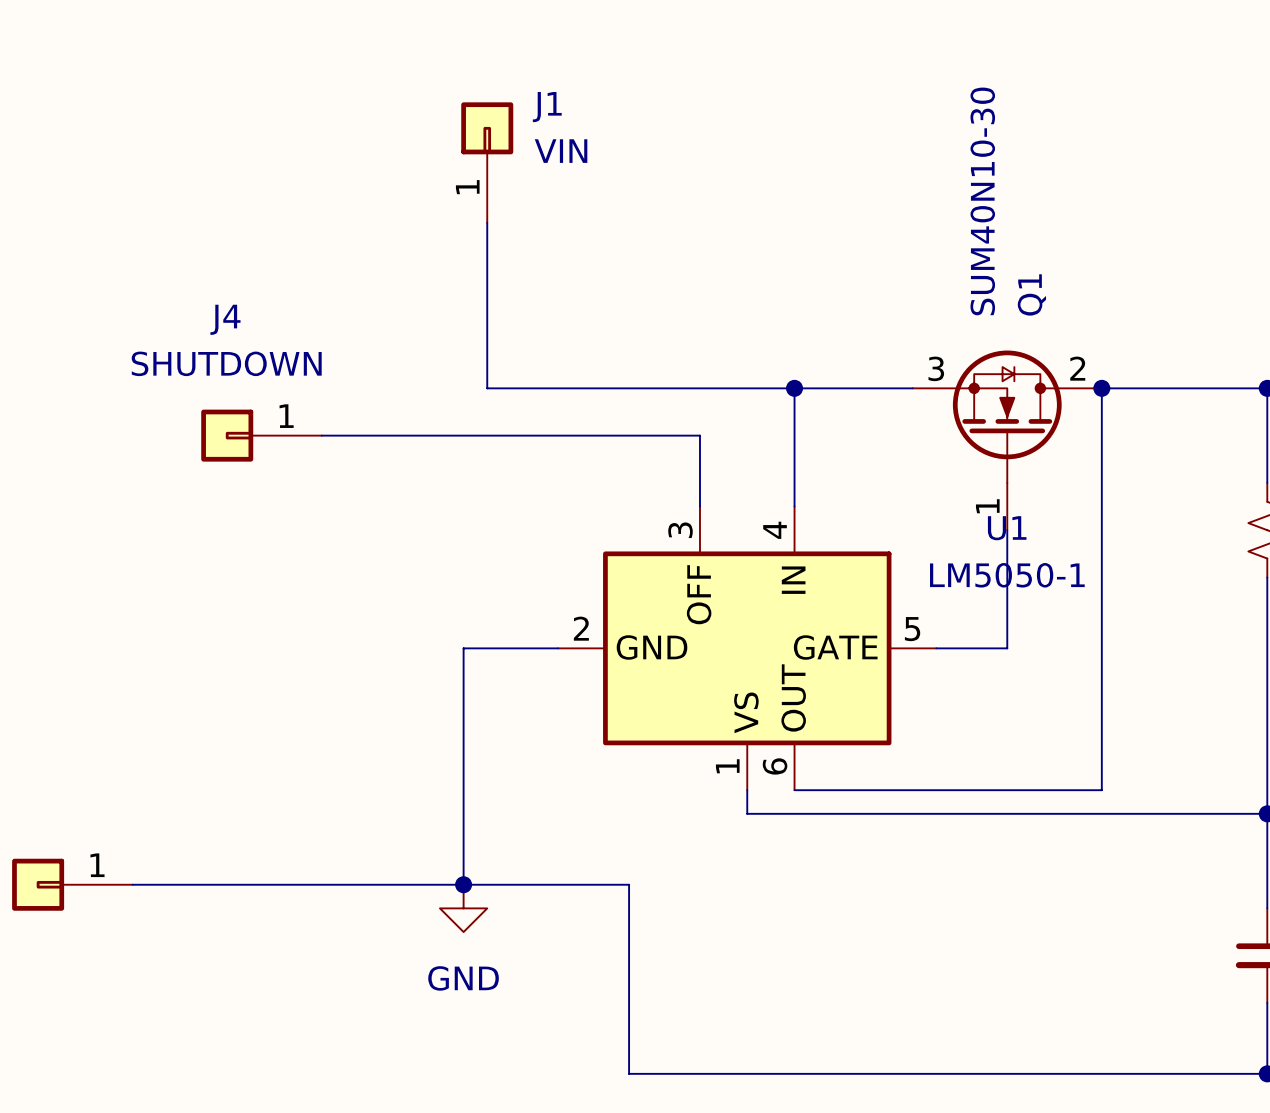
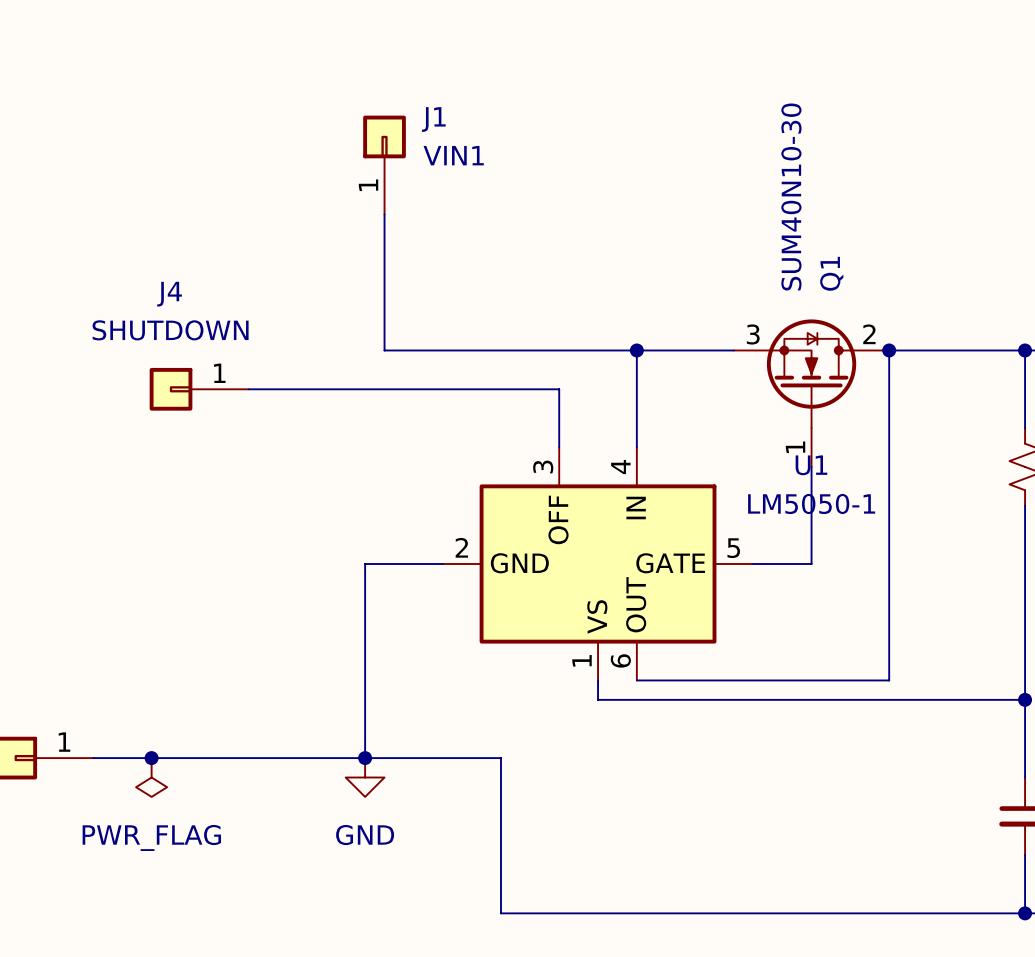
J1 value: VIN (561, 151) -> VIN1 (453, 155)
junction: none -> (151, 758)
power symbol: none -> PWR_FLAG (151, 777)

